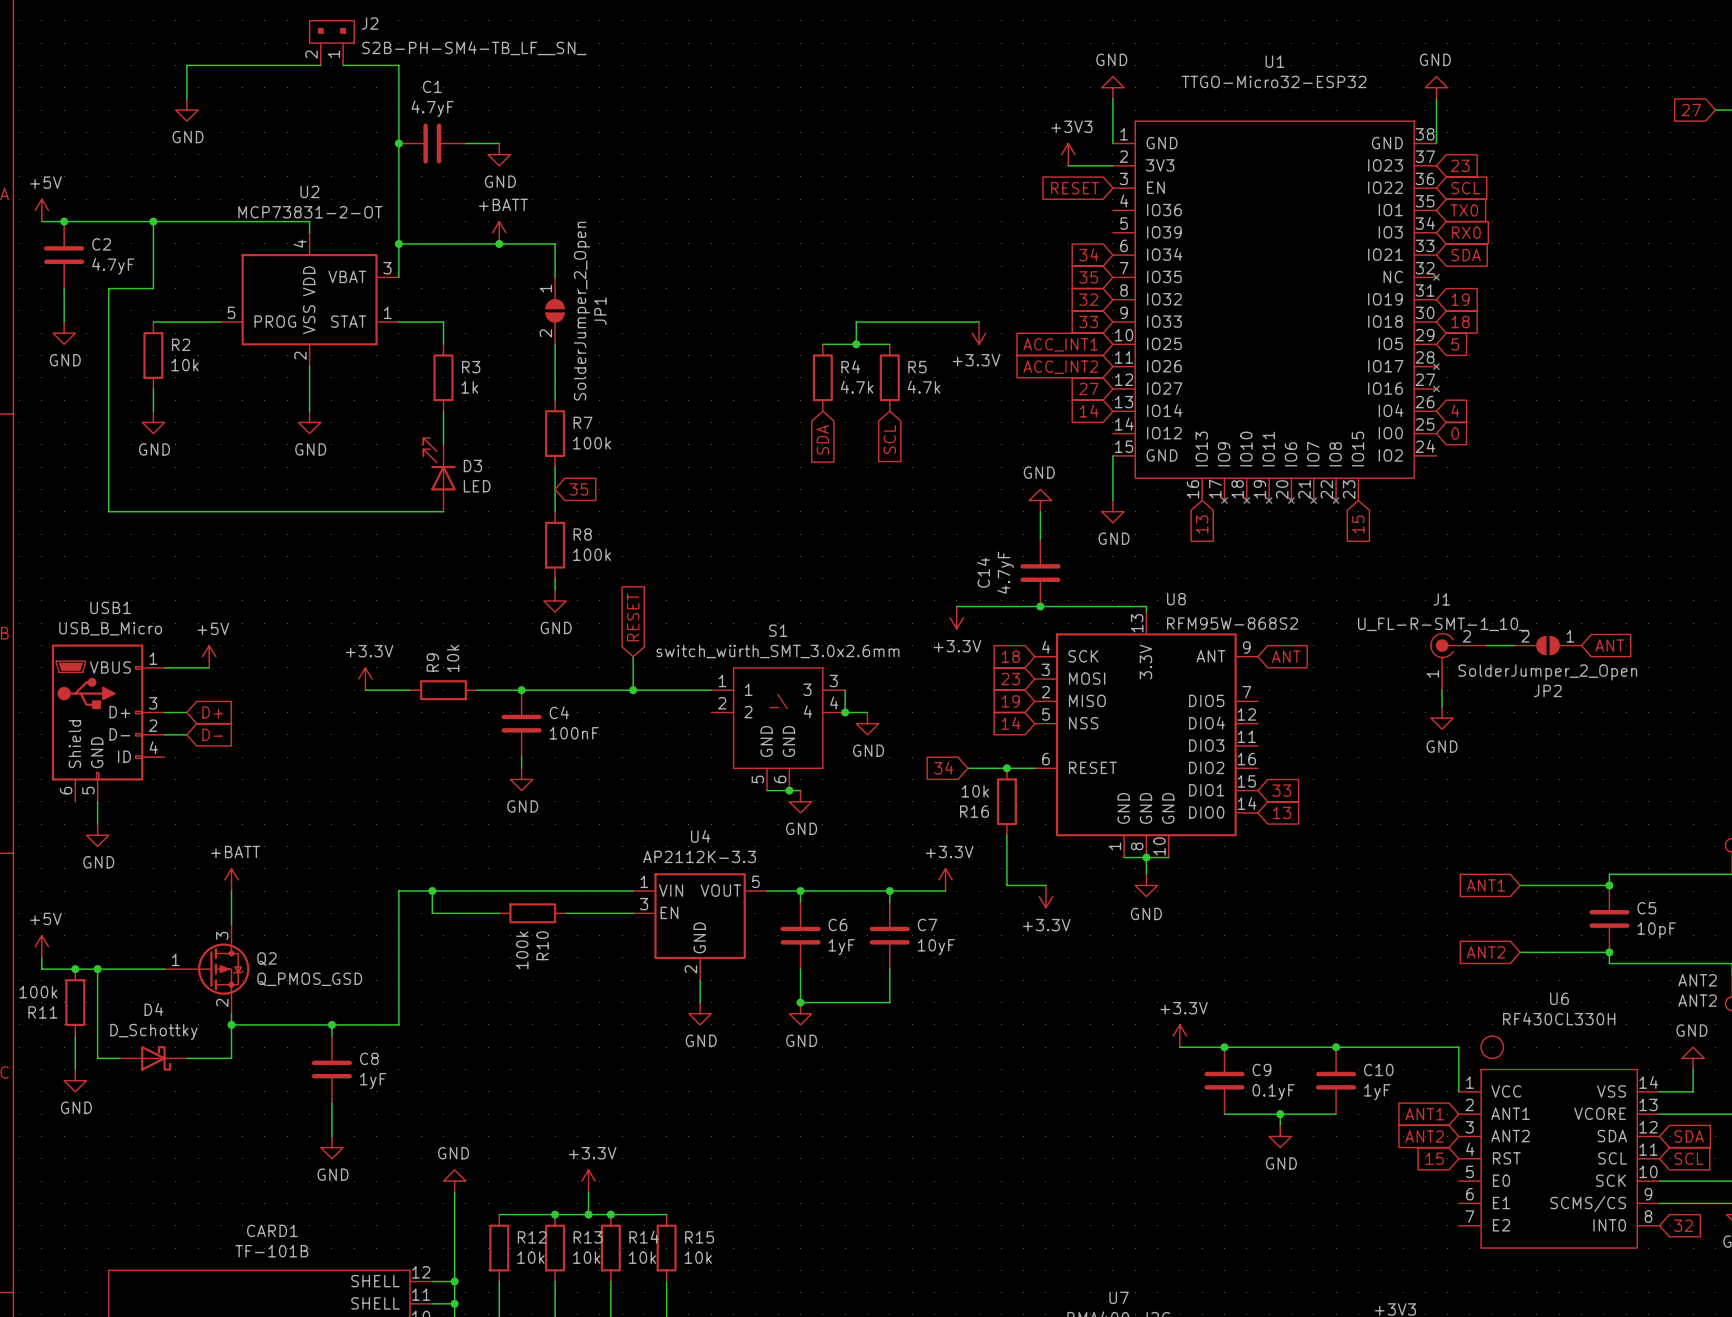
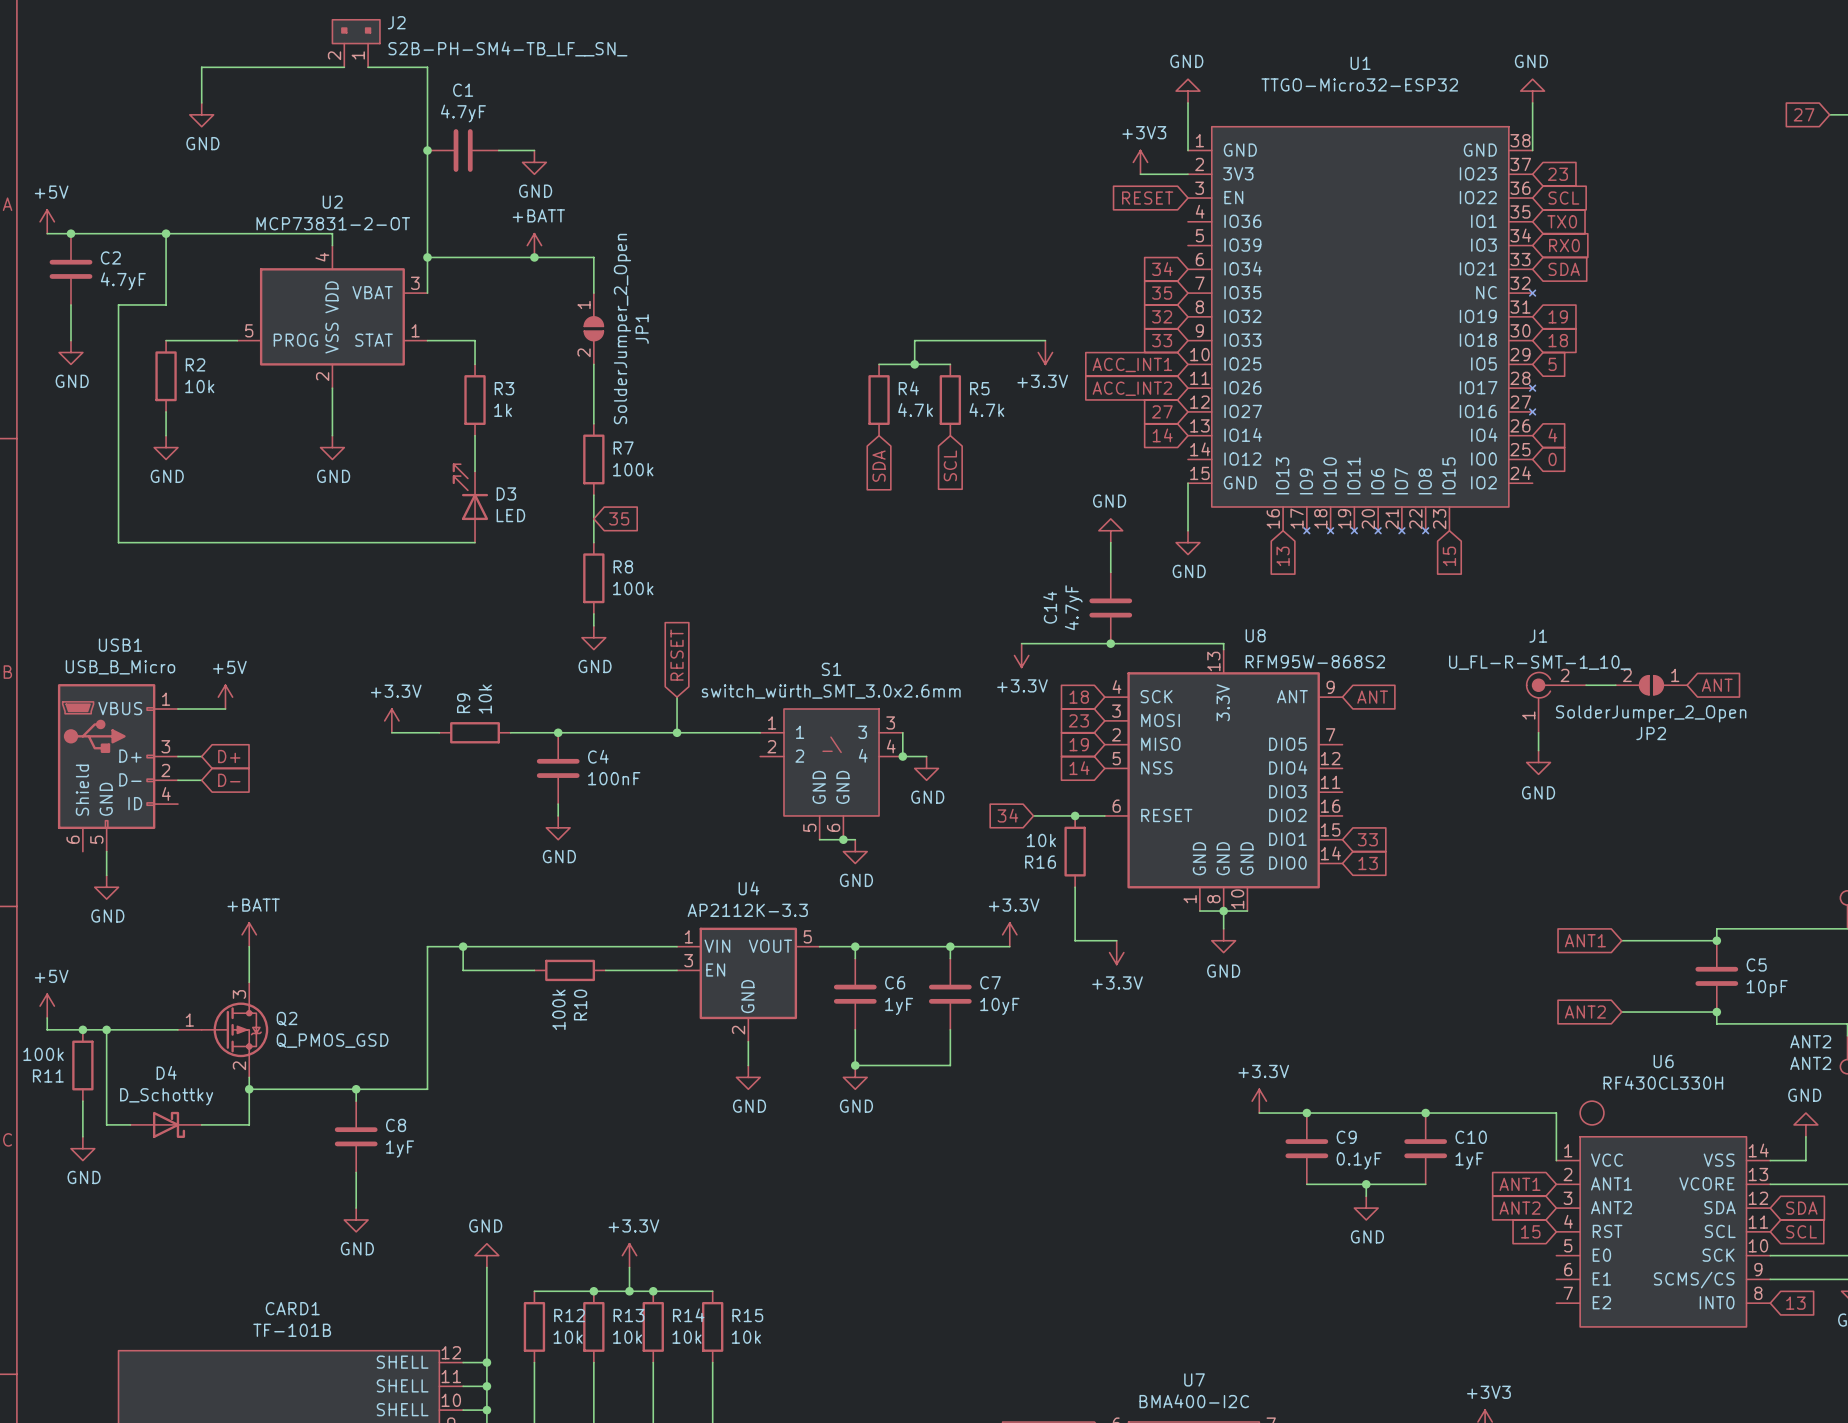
global label: 32 (1683, 1225) -> 13 (1795, 1303)

